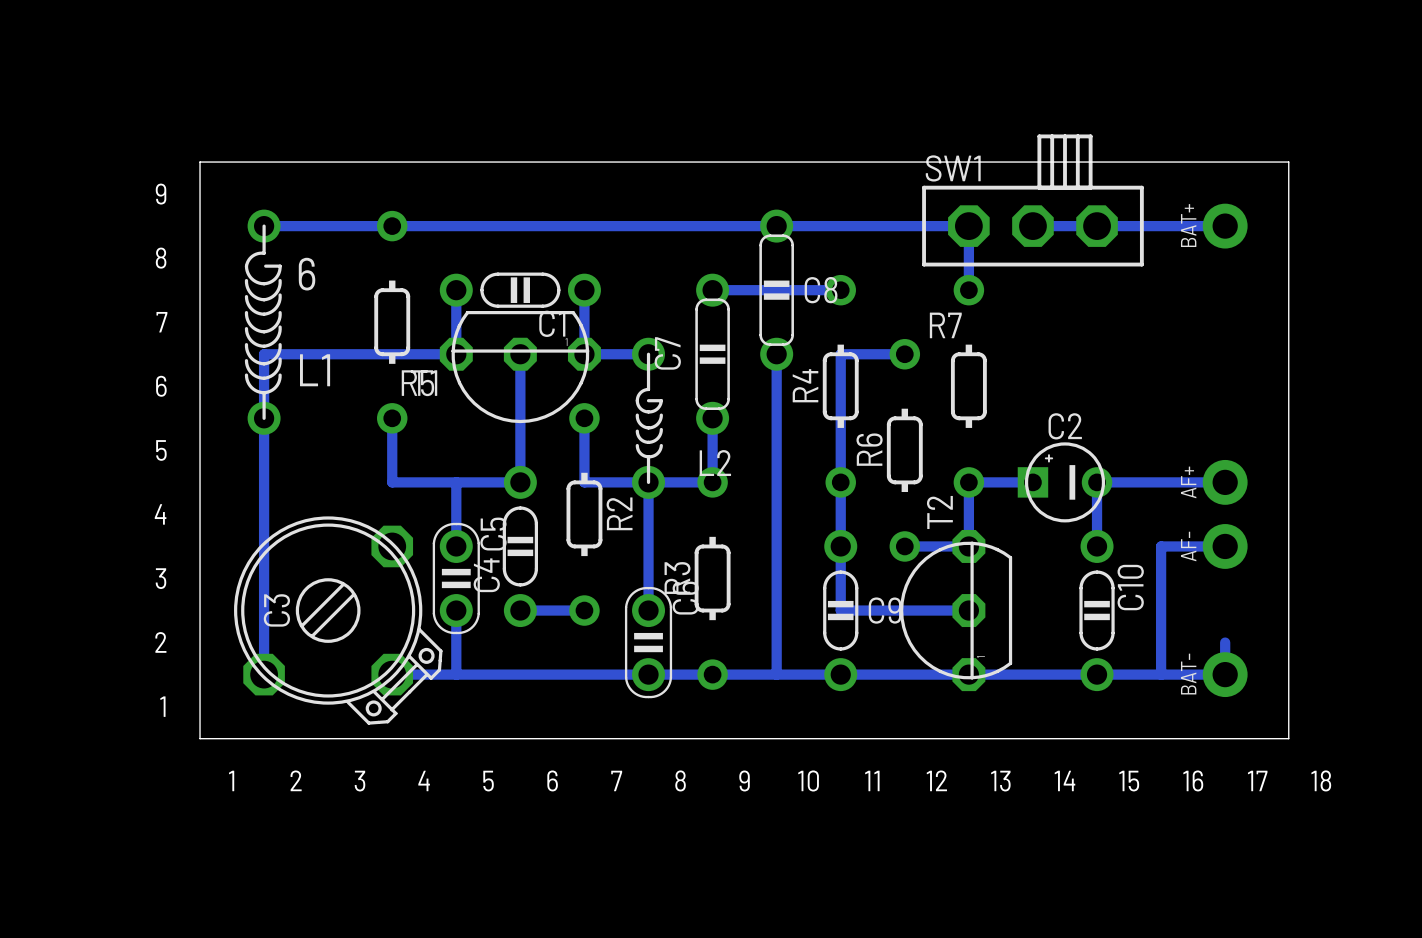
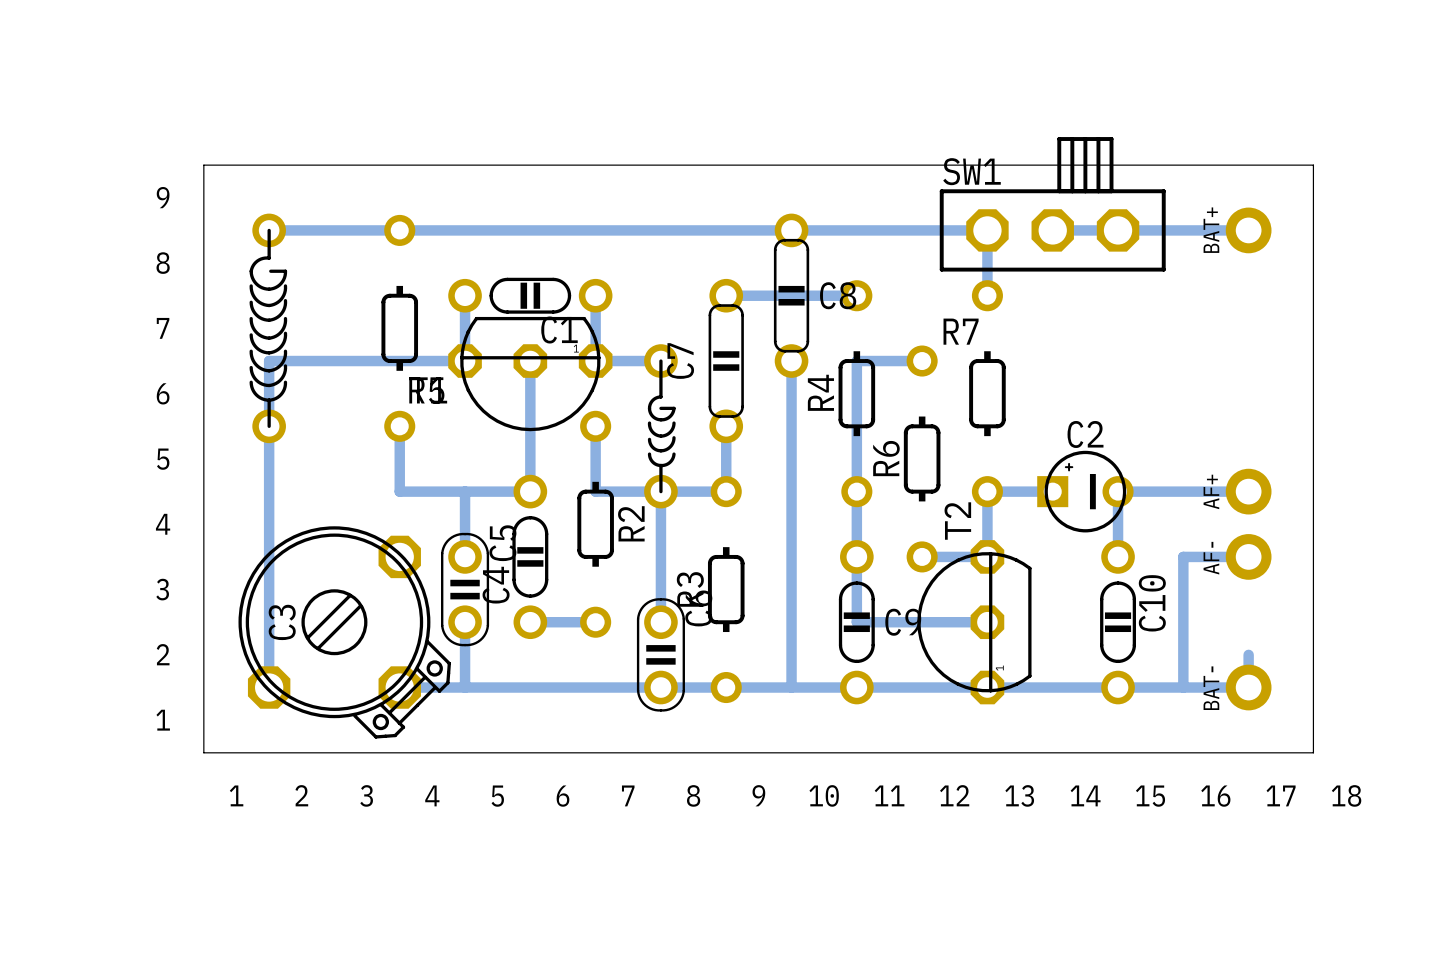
L1 value: 6 (307, 274) -> none
L1 name: L1 (315, 370) -> none
L2 name: L2 (715, 463) -> none

